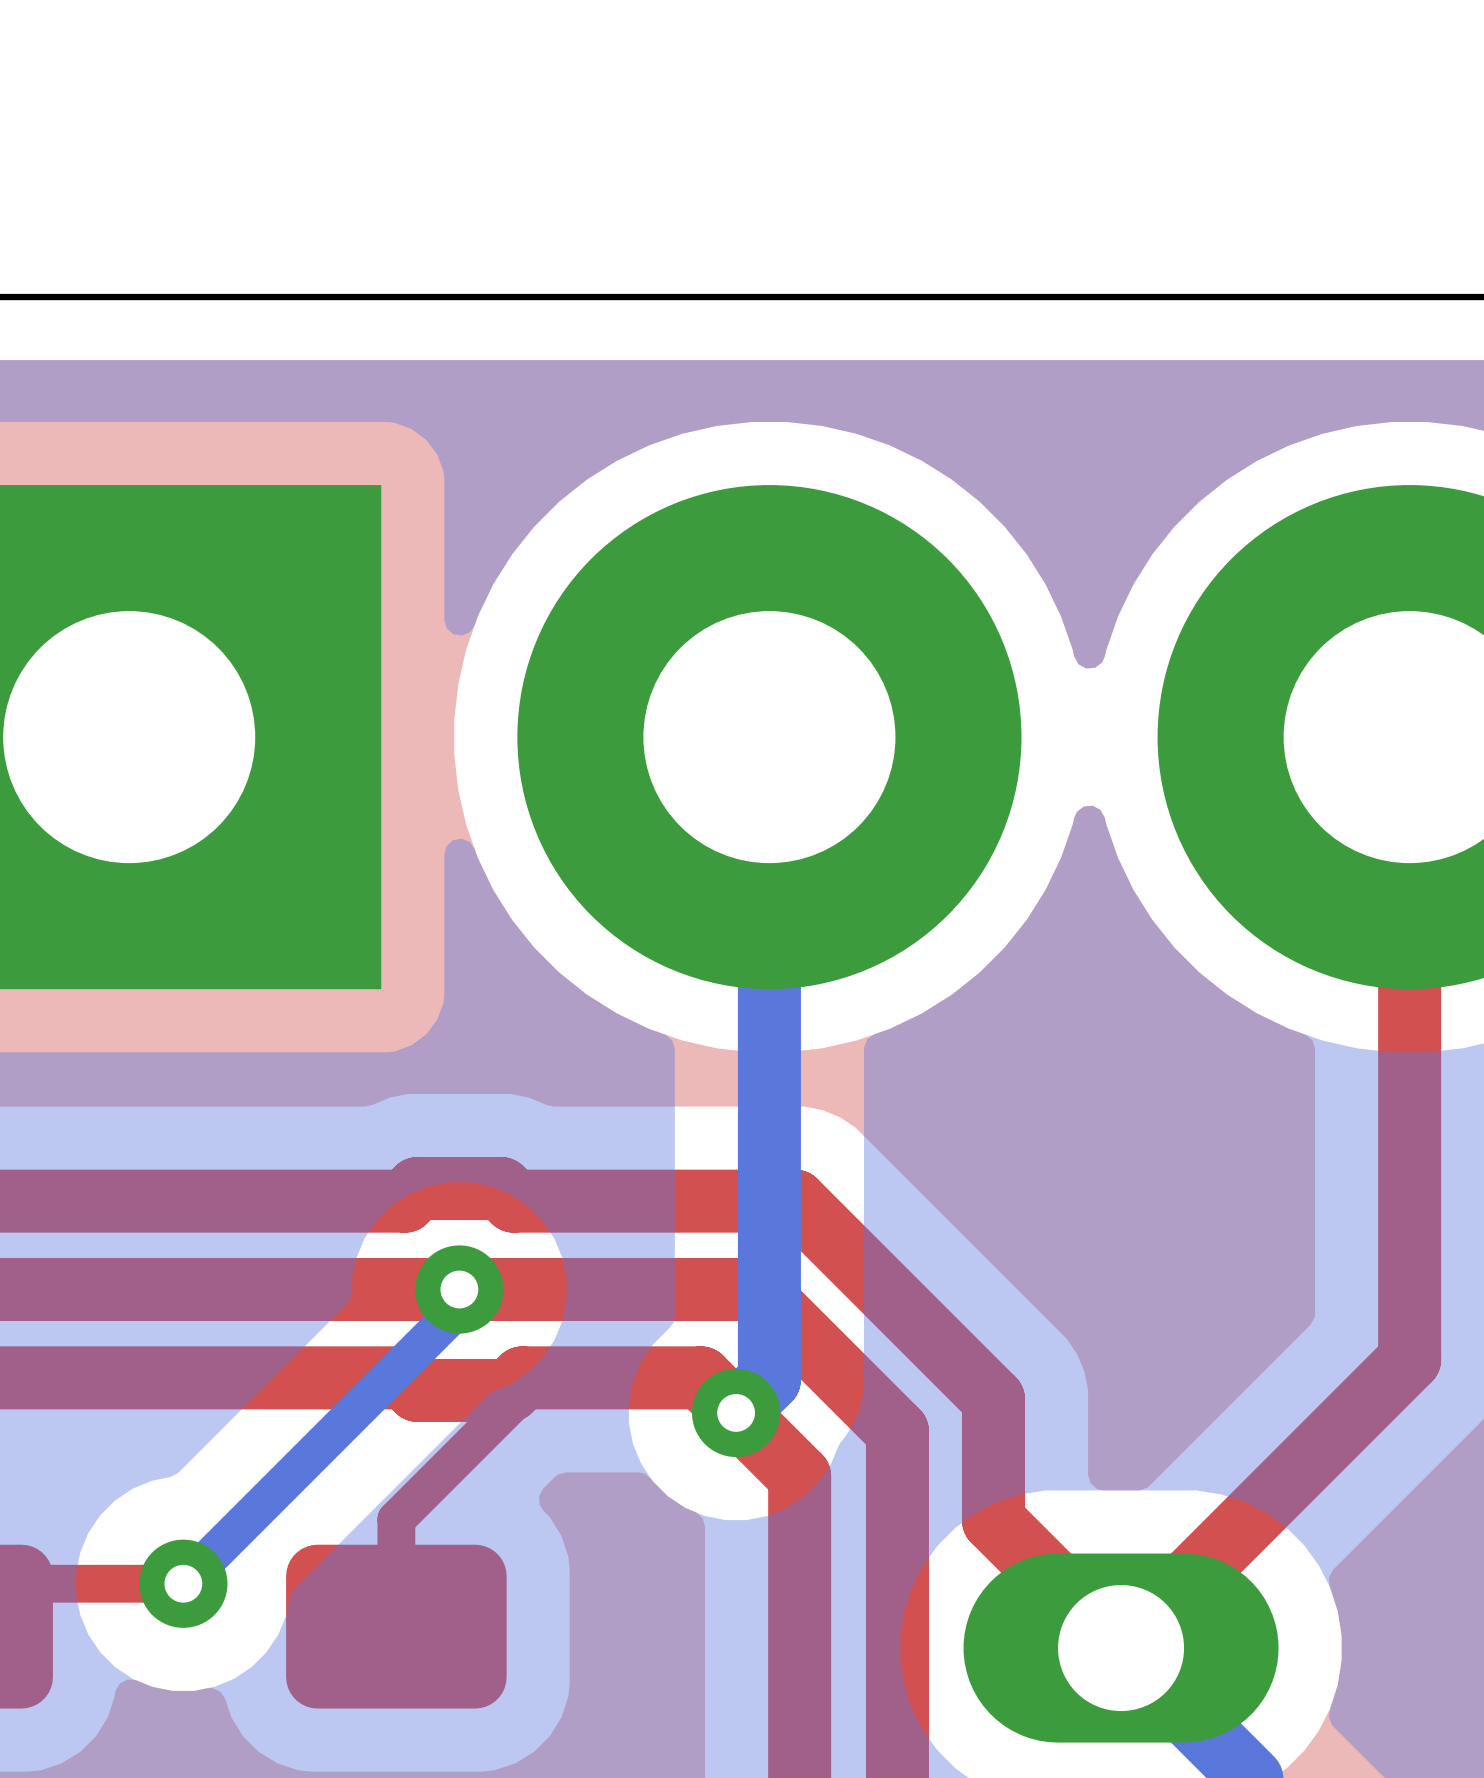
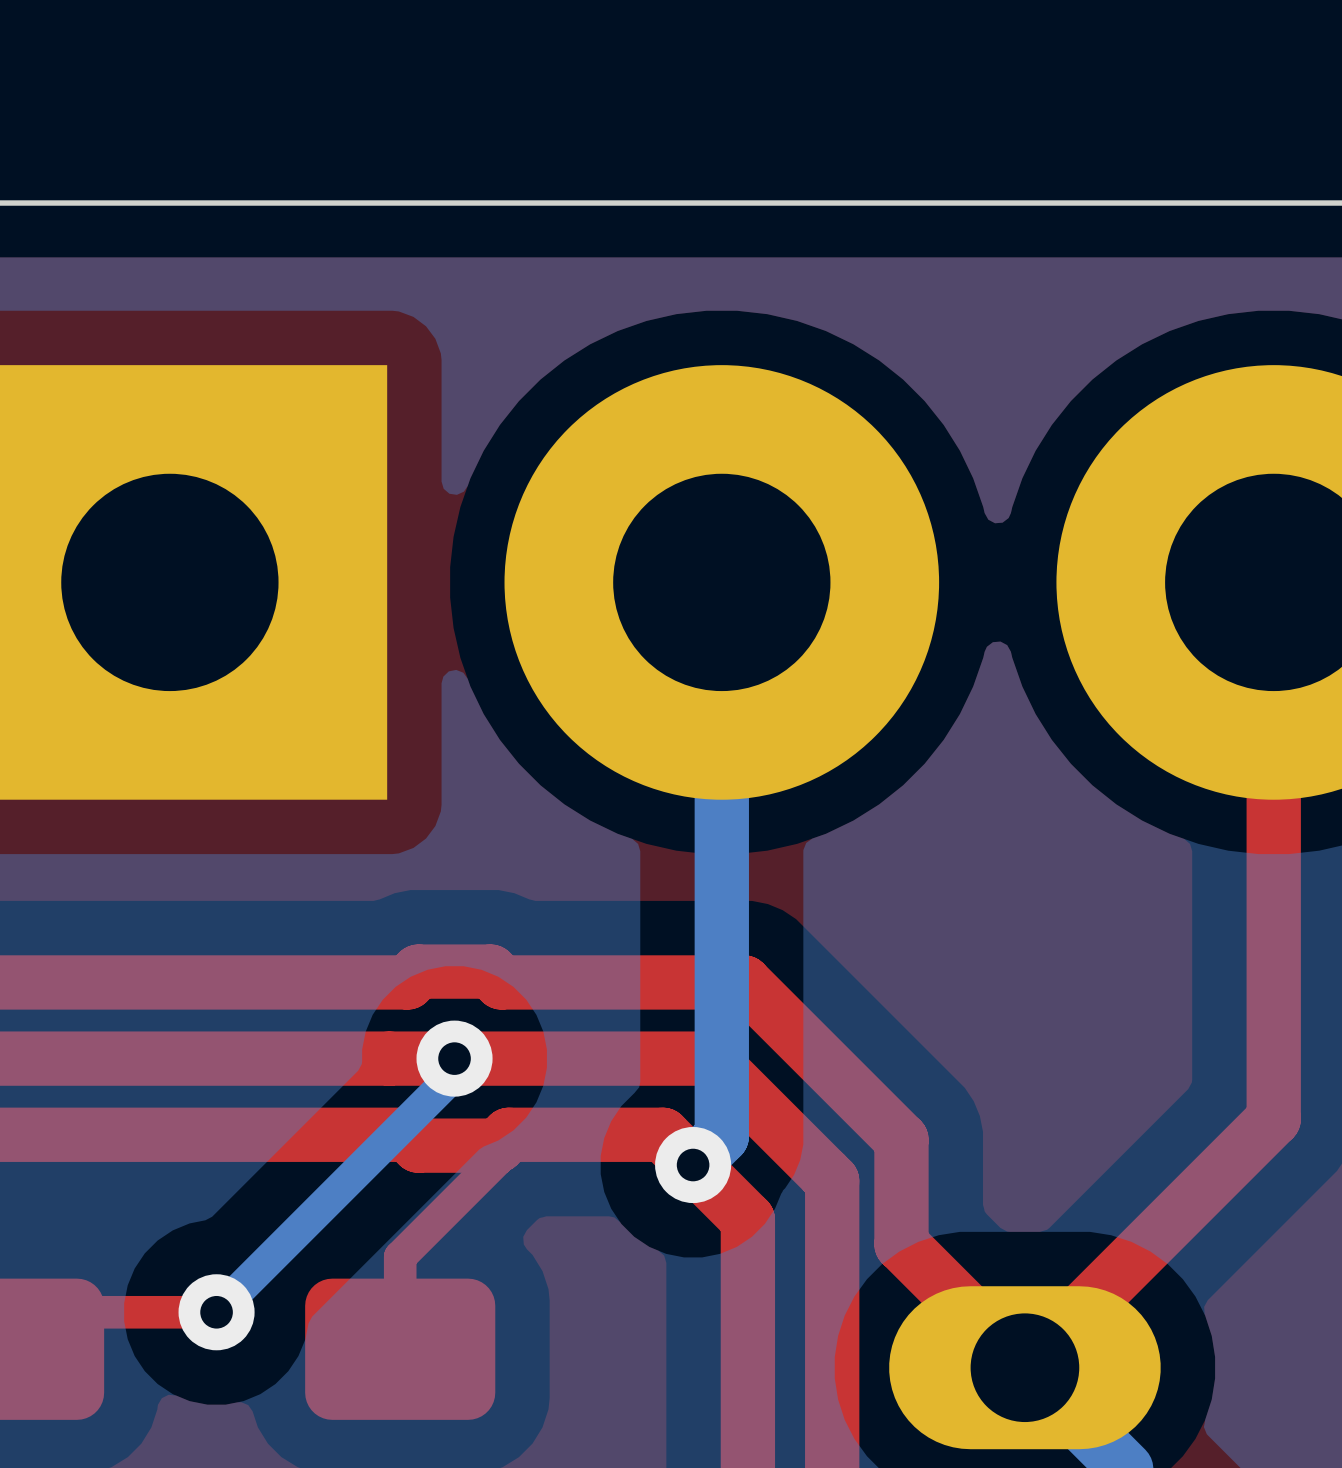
top track: (977, 1383) (993, 1399) (993, 1520) -> (901, 1139) (901, 1244) (914, 1257)

